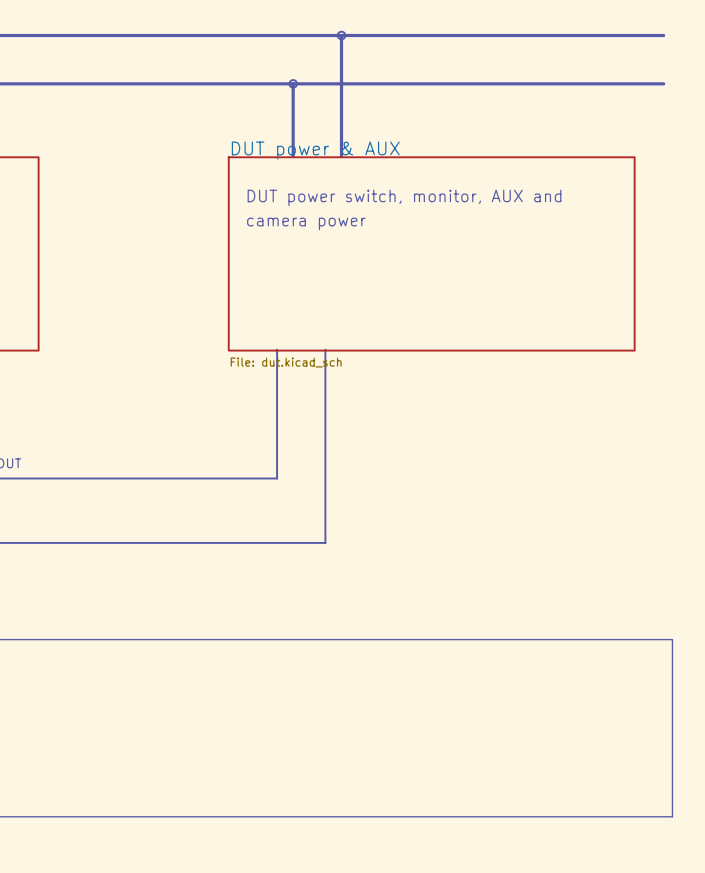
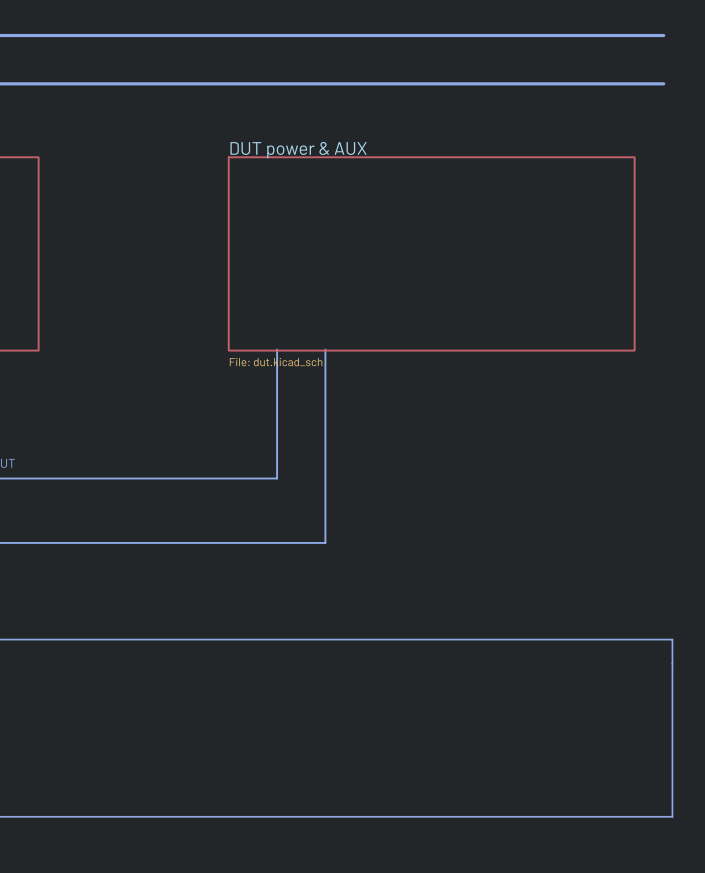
drawing: [336, 30, 347, 41] -> none
line: (341, 35) (341, 156) -> none
drawing: [288, 79, 298, 89] -> none
line: (293, 83) (293, 156) -> none
text: DUT power switch, monitor, AUX and (404, 197) -> none
text: camera power (306, 223) -> none

